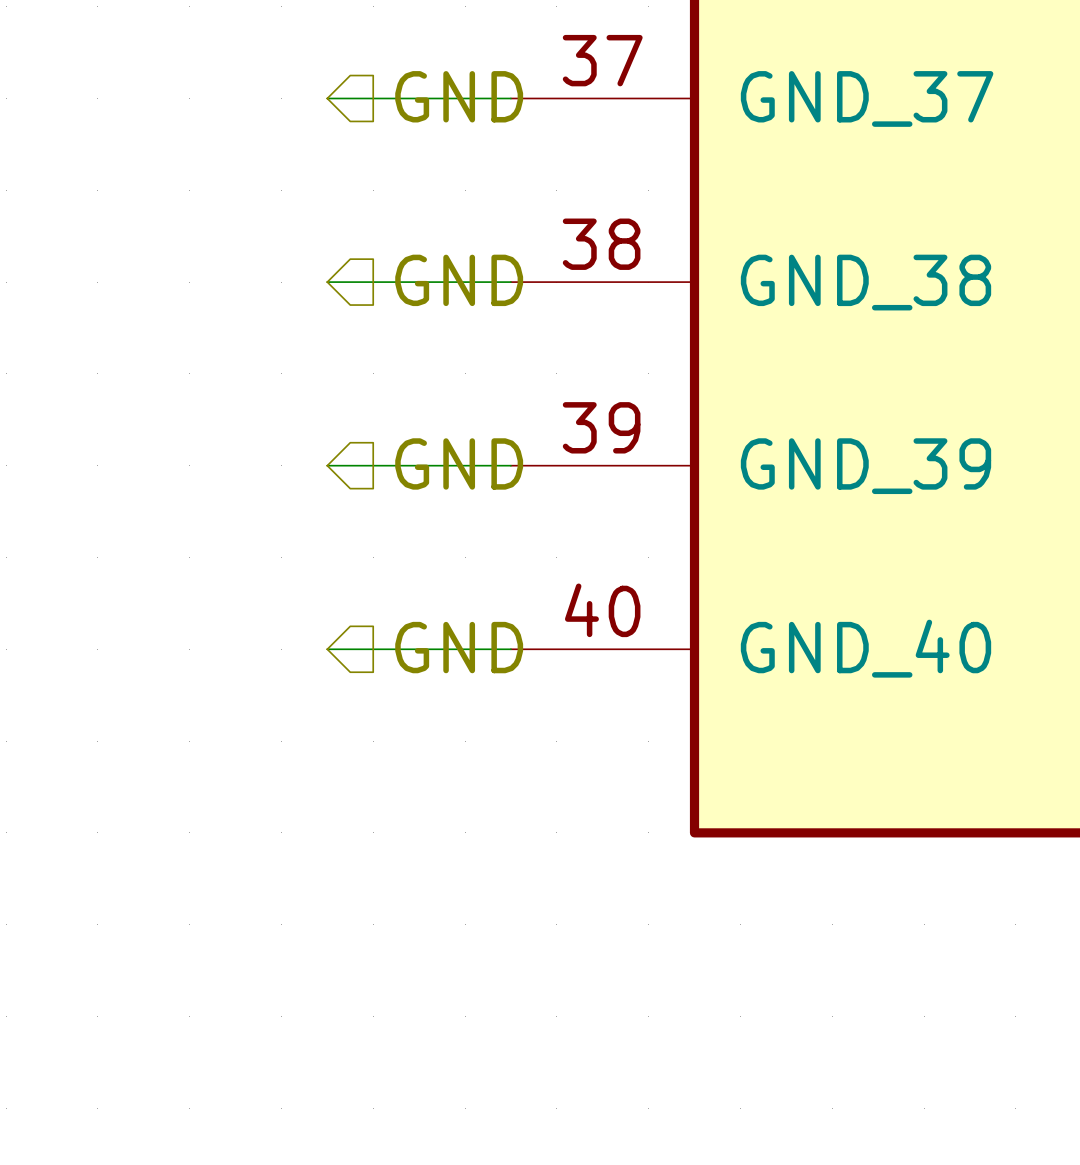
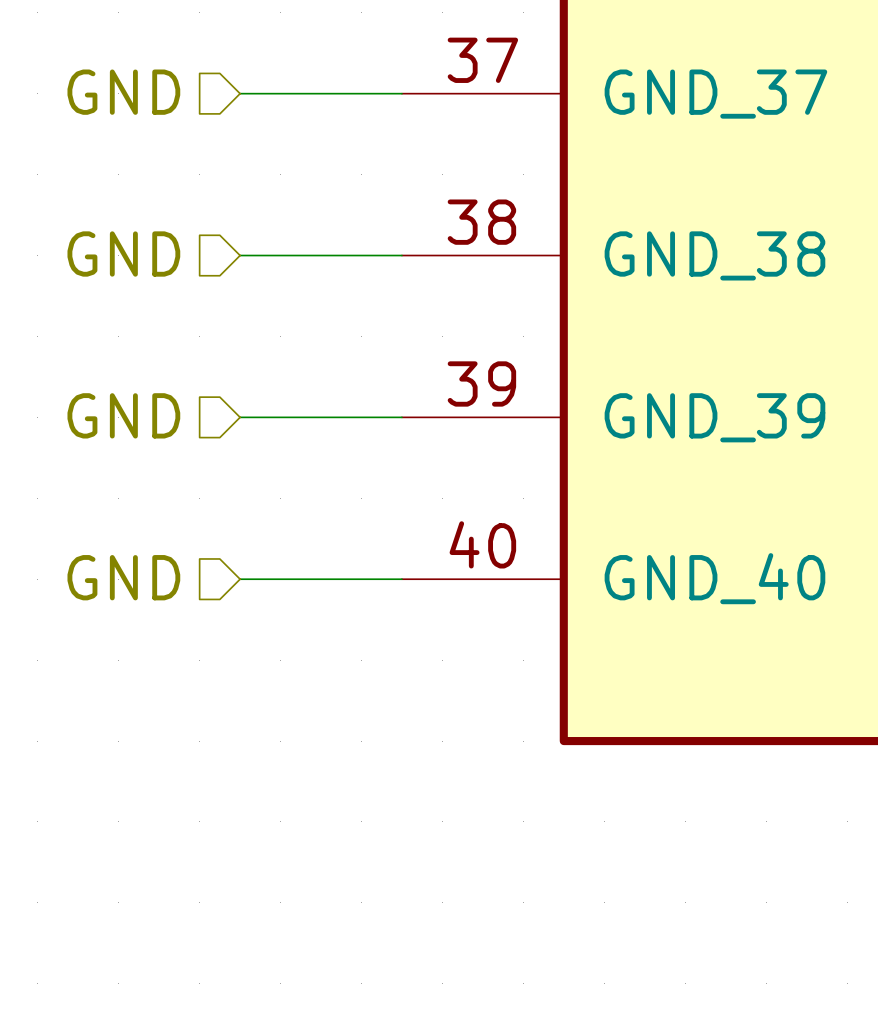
hierarchical label: none -> GND (123, 92)
hierarchical label: GND (459, 96) -> none
hierarchical label: none -> GND (123, 254)
hierarchical label: GND (459, 280) -> none
hierarchical label: none -> GND (123, 415)
hierarchical label: GND (459, 463) -> none
hierarchical label: none -> GND (123, 577)
hierarchical label: GND (459, 647) -> none

